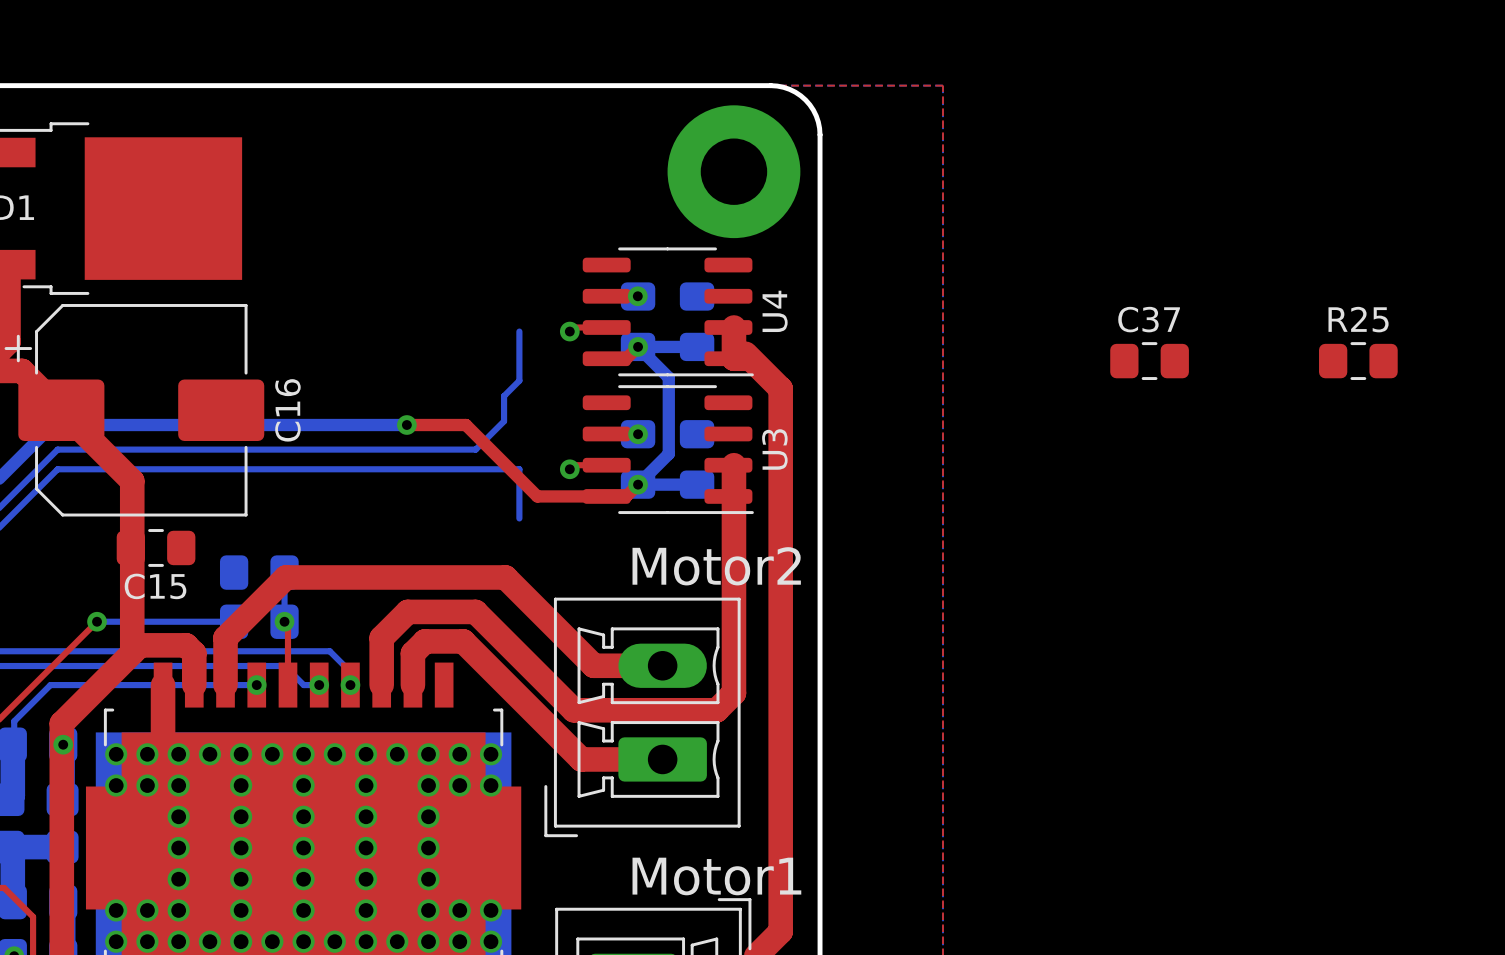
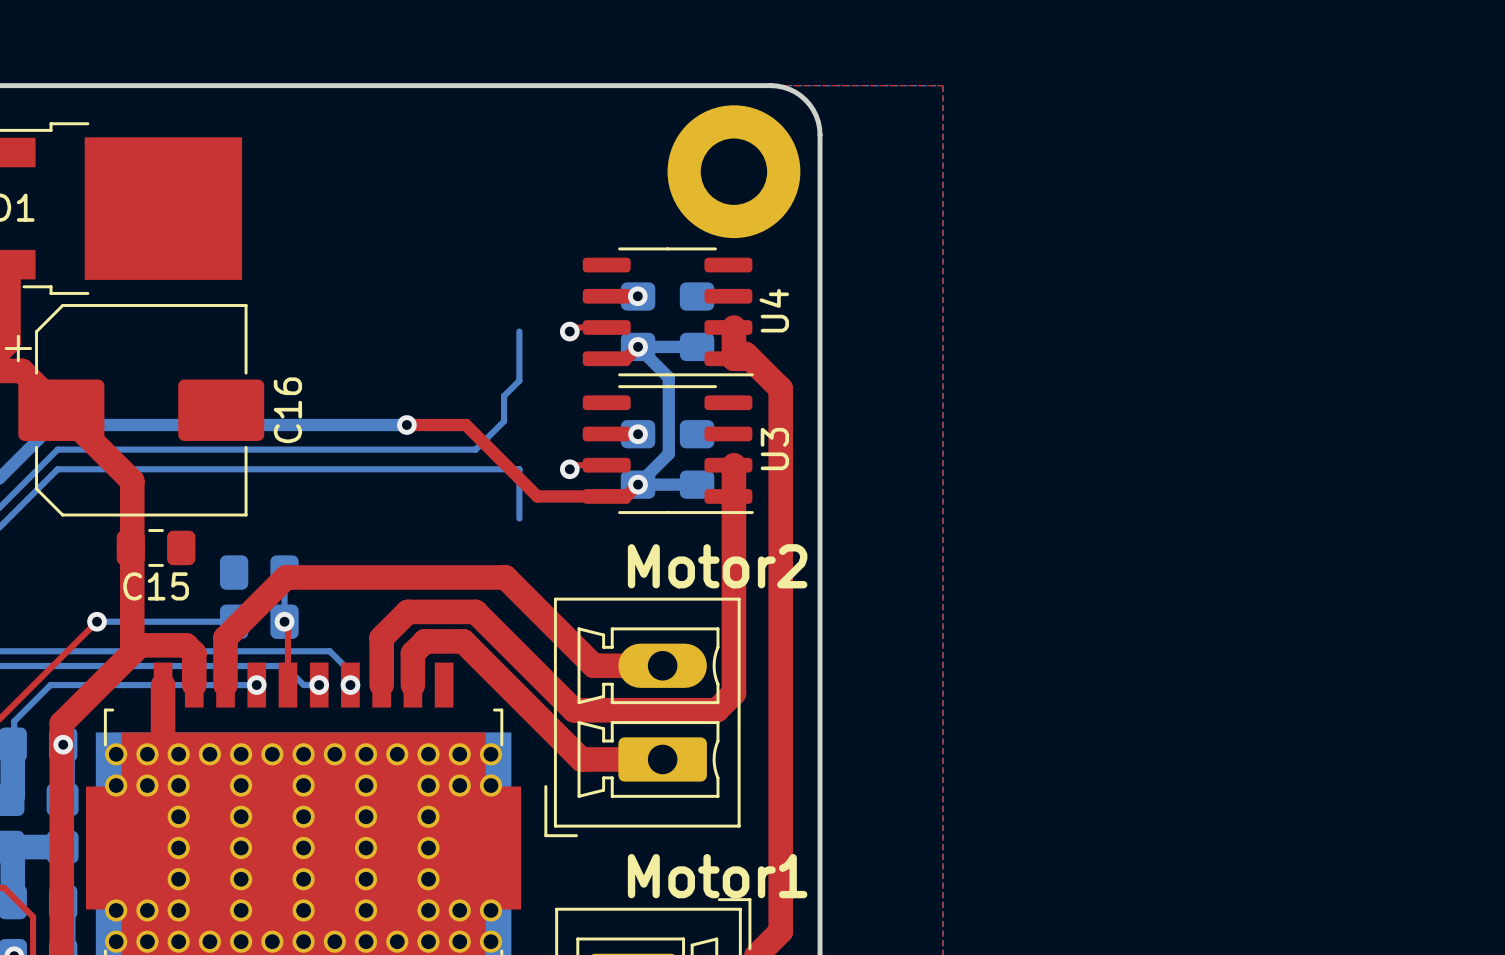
C37: (1149, 361) -> none
R25: (1358, 361) -> none

